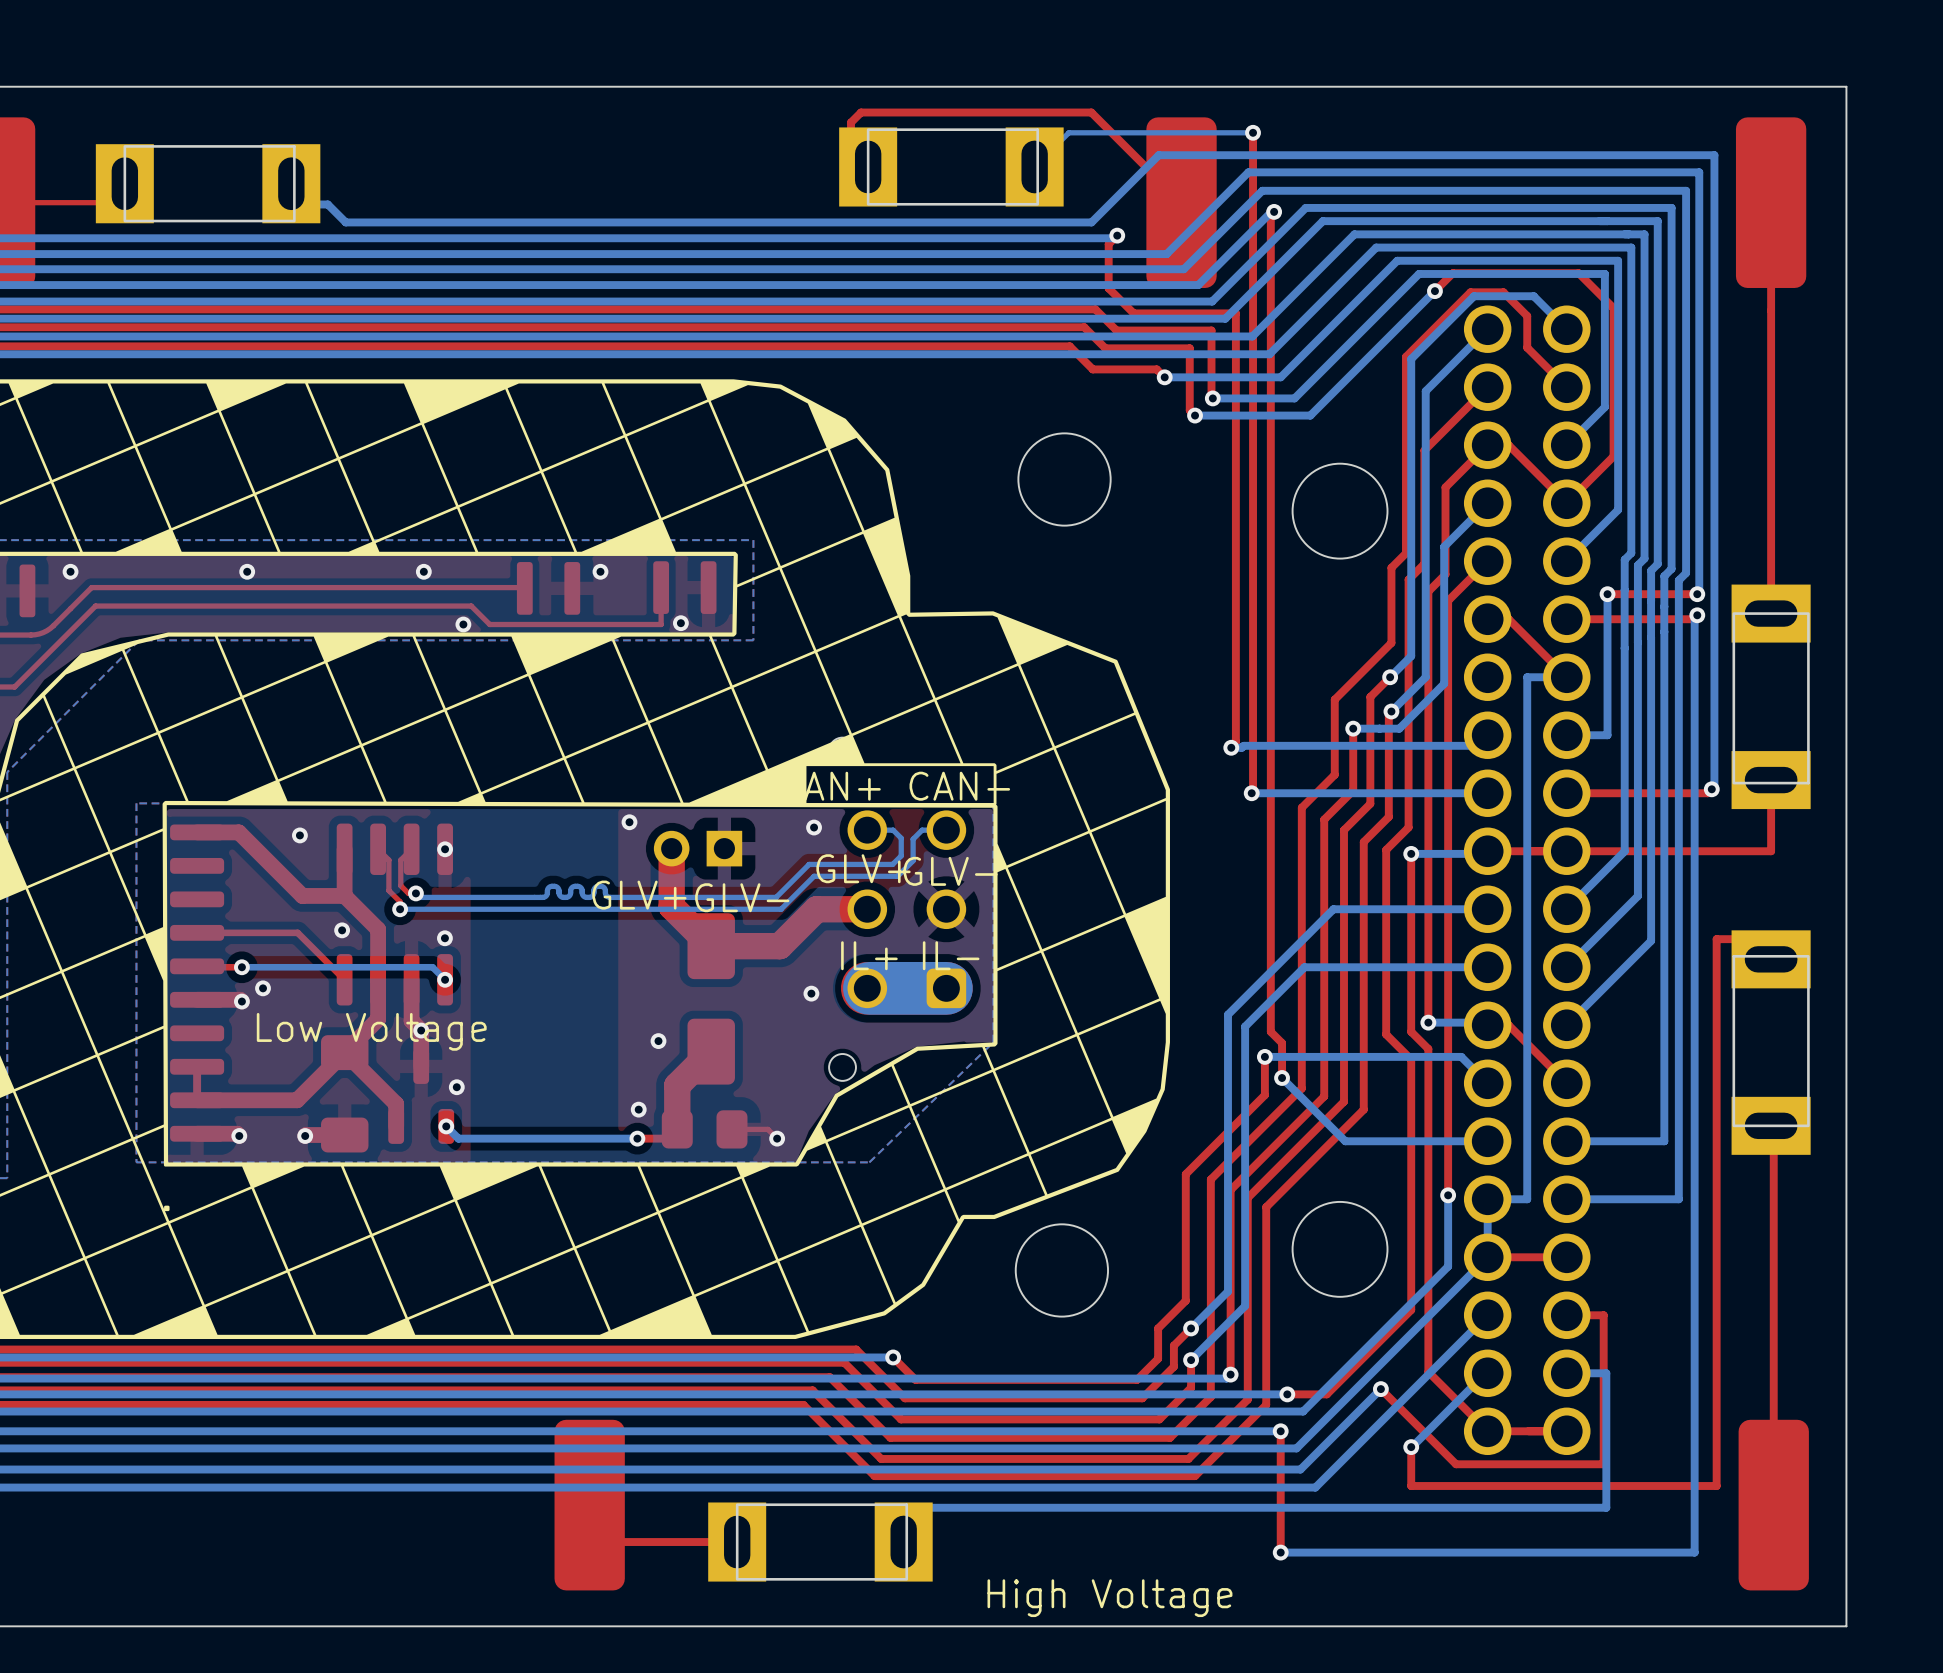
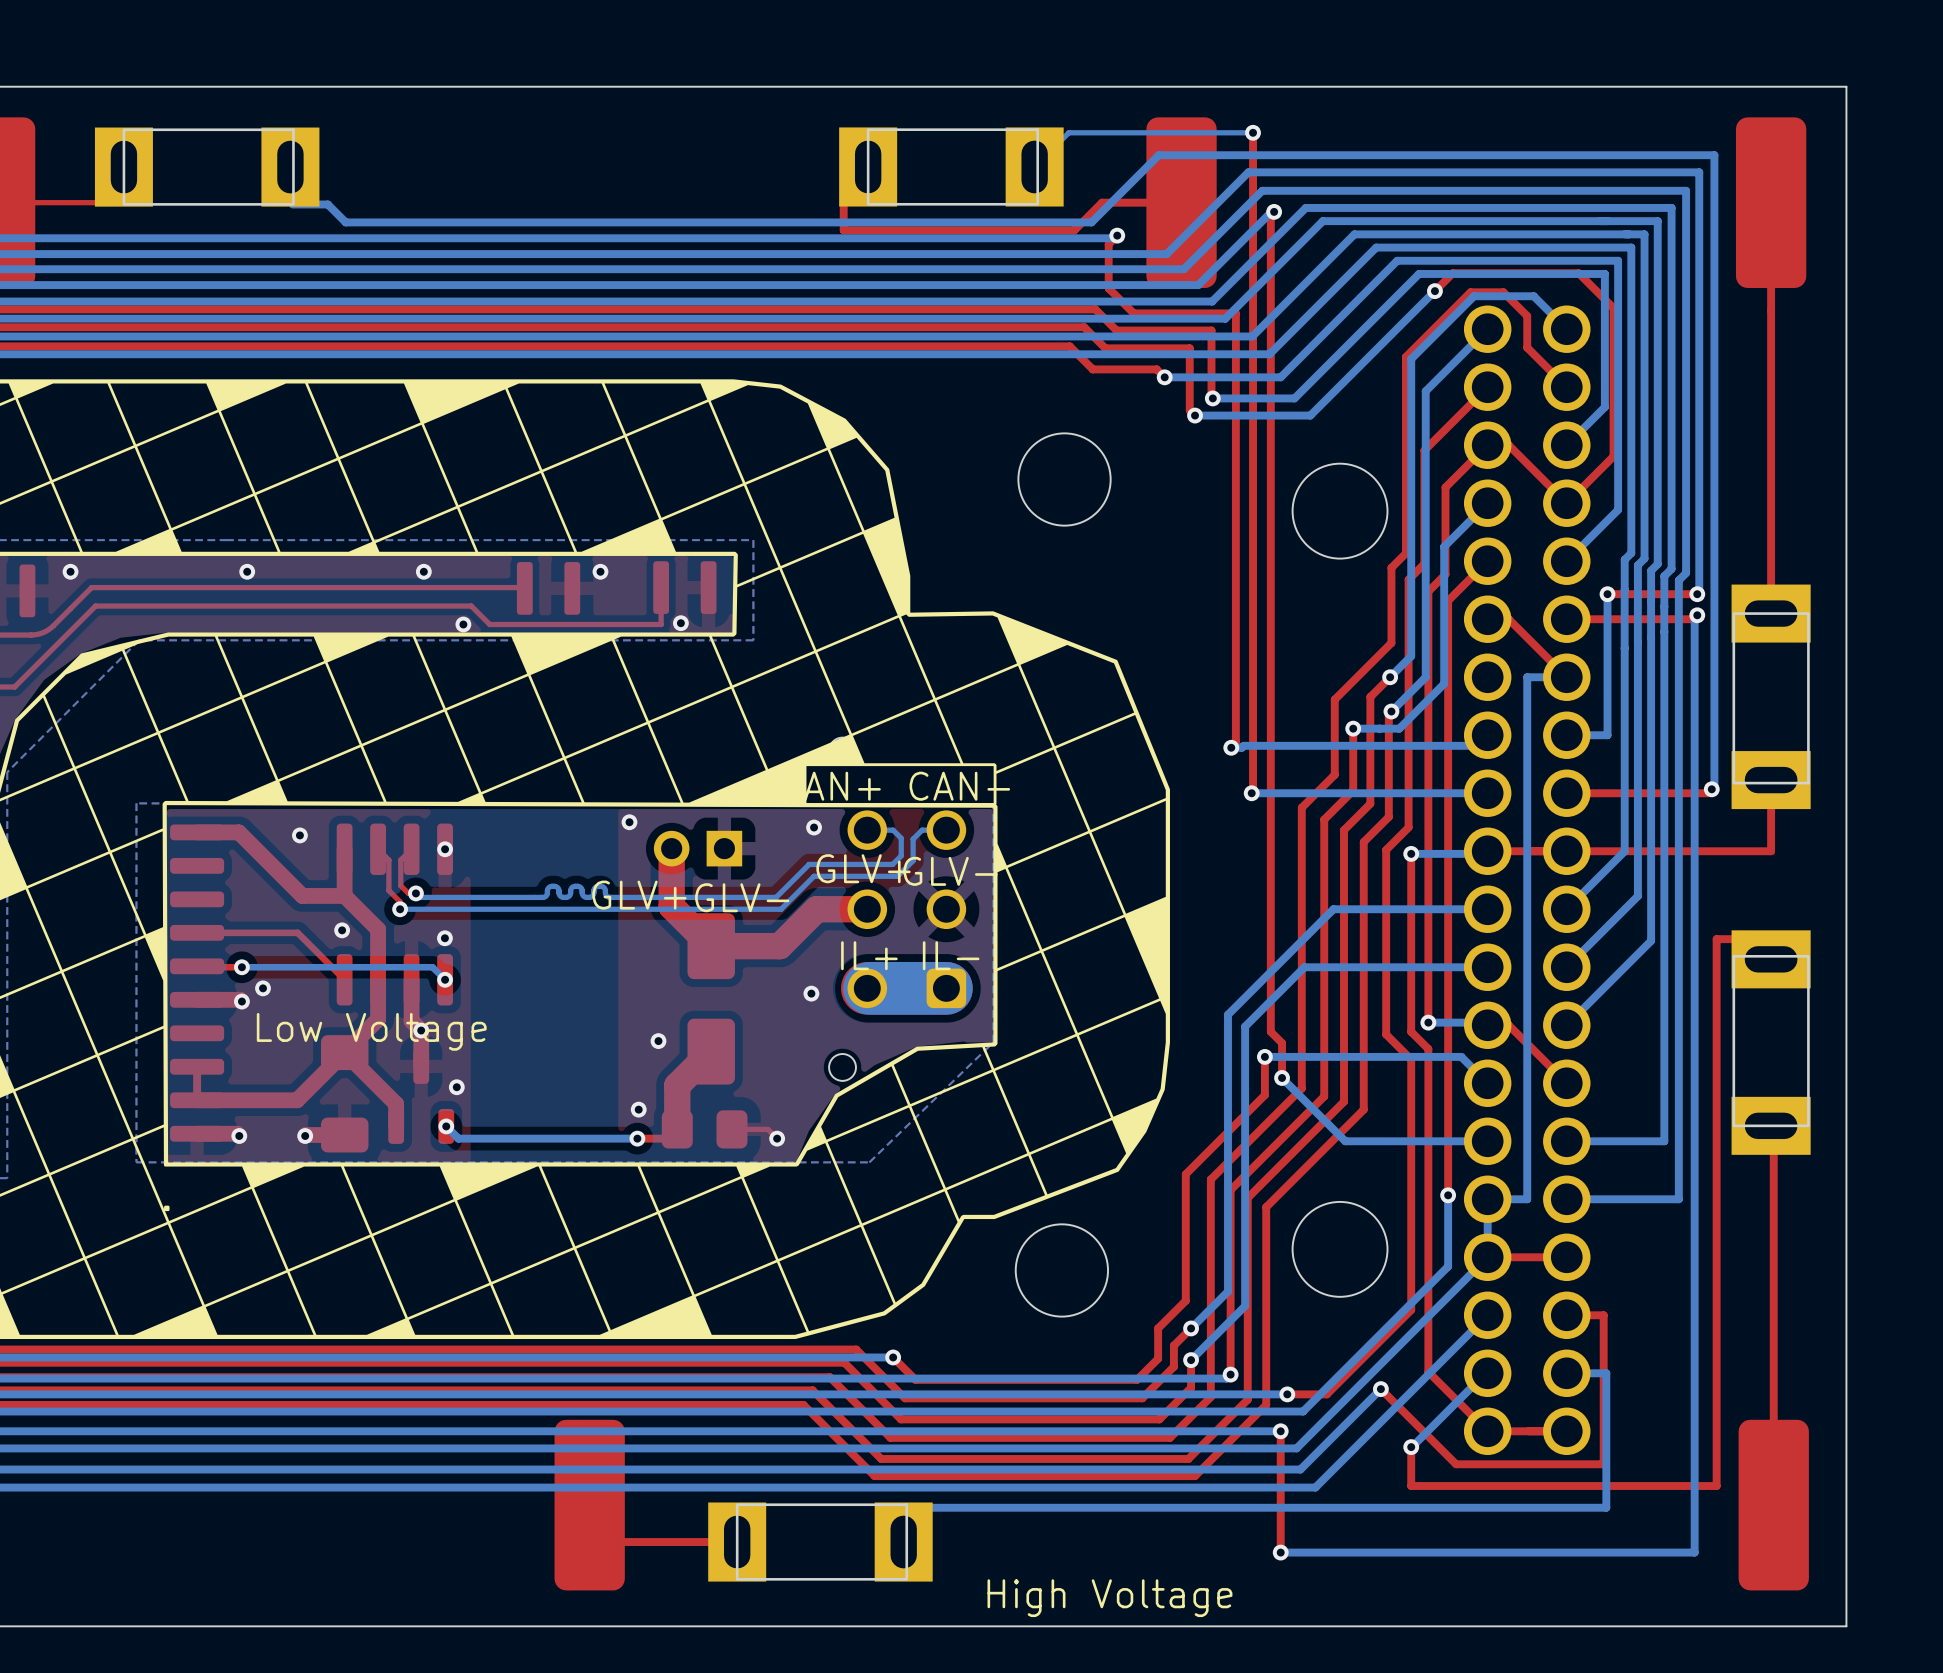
top track: (868, 166) (850, 149) (850, 122) (861, 112) (1091, 112) (1181, 202) -> (866, 163) (866, 171) (843, 194) (843, 230) (1074, 230) (1102, 202) (1181, 202)
part position: (208, 183) -> (207, 167)

